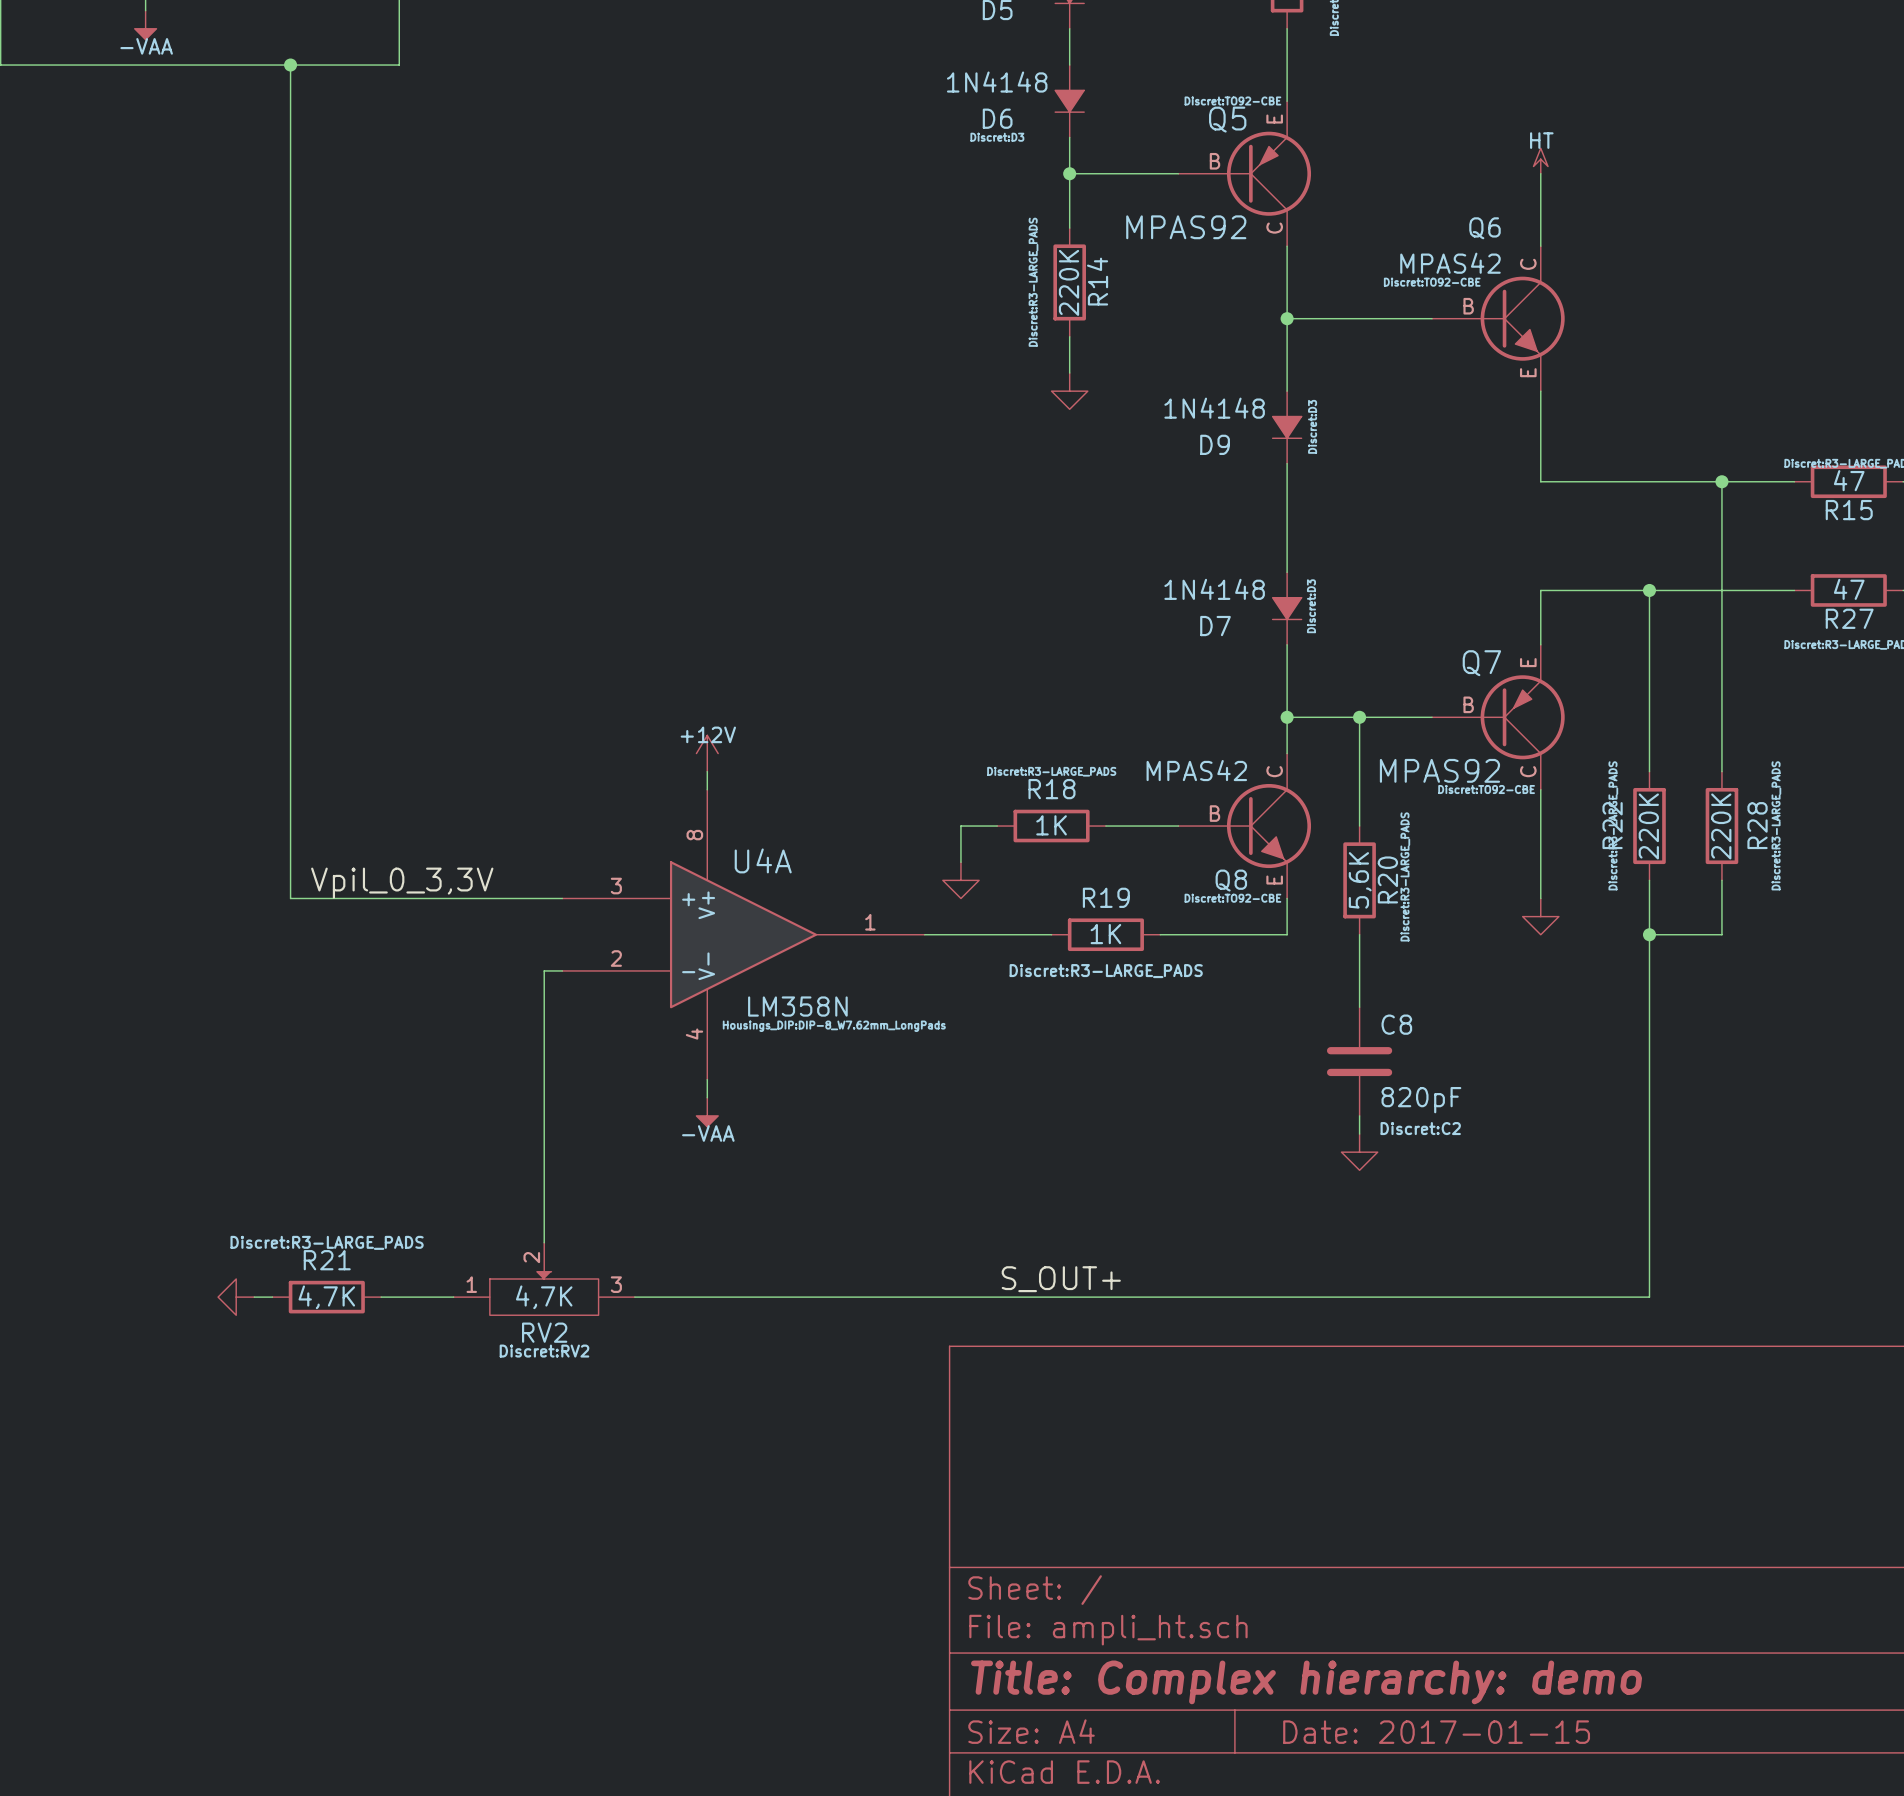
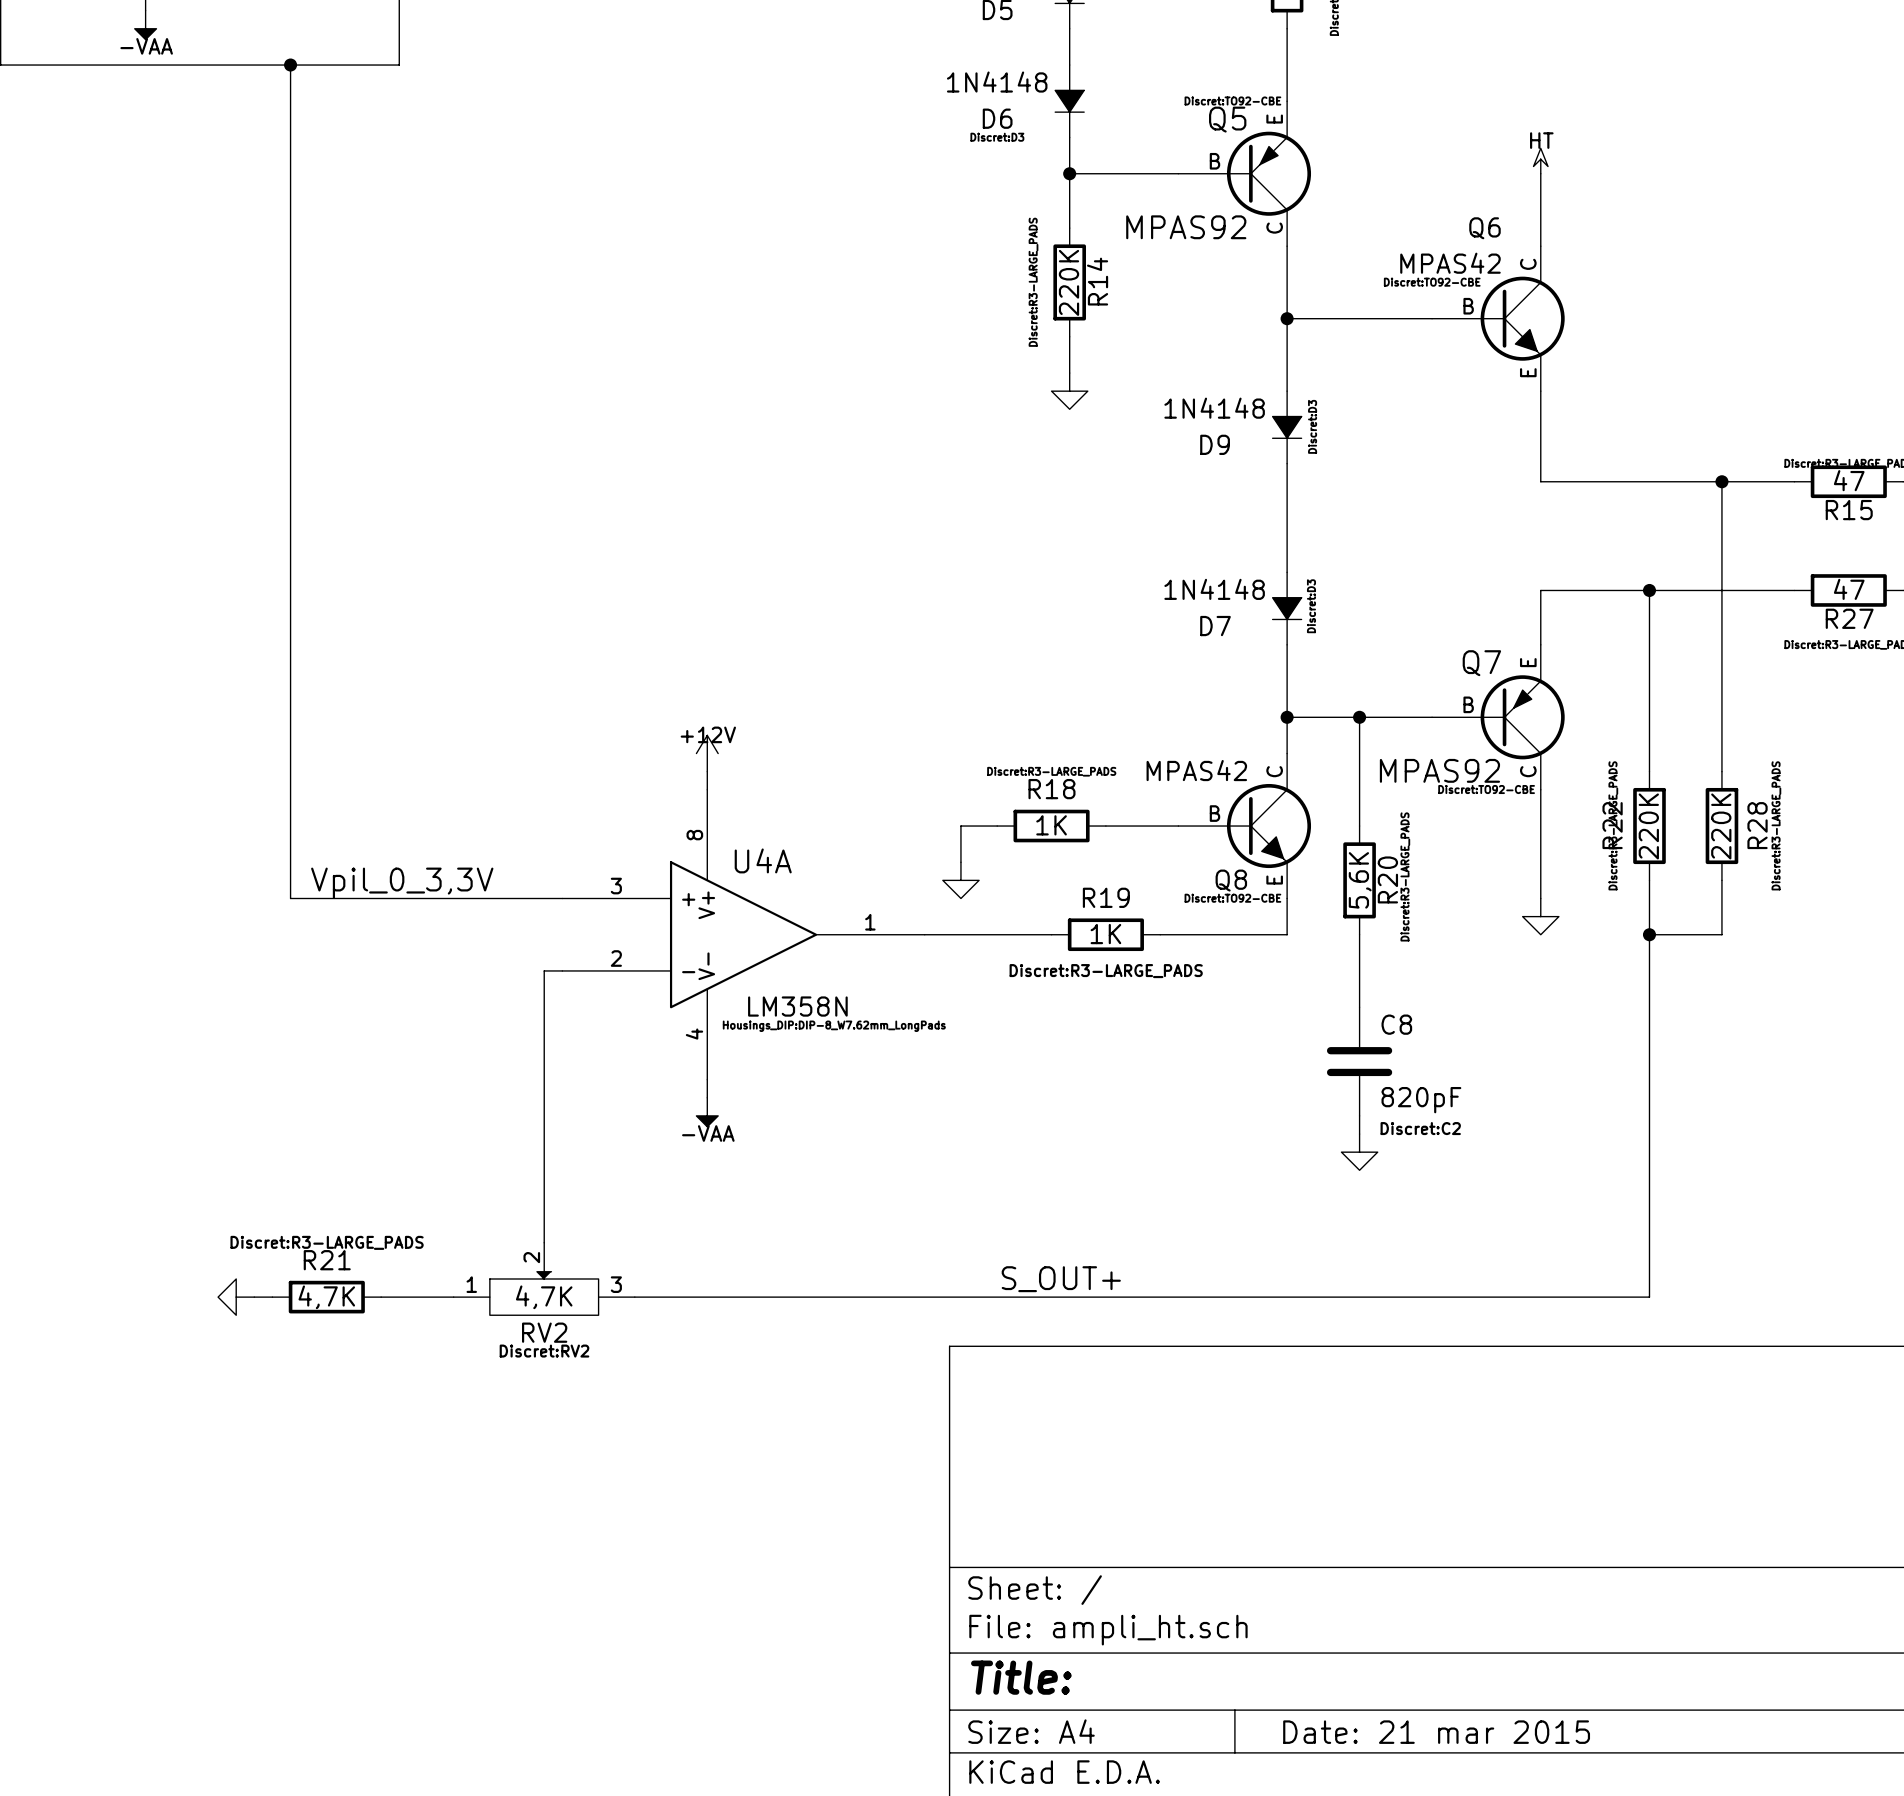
title block: Title: Complex hierarchy: demo (1306, 1682) -> Title: (1021, 1677)
title block: Date: 2017-01-15 (1436, 1732) -> Date: 21 mar 2015 (1436, 1732)

